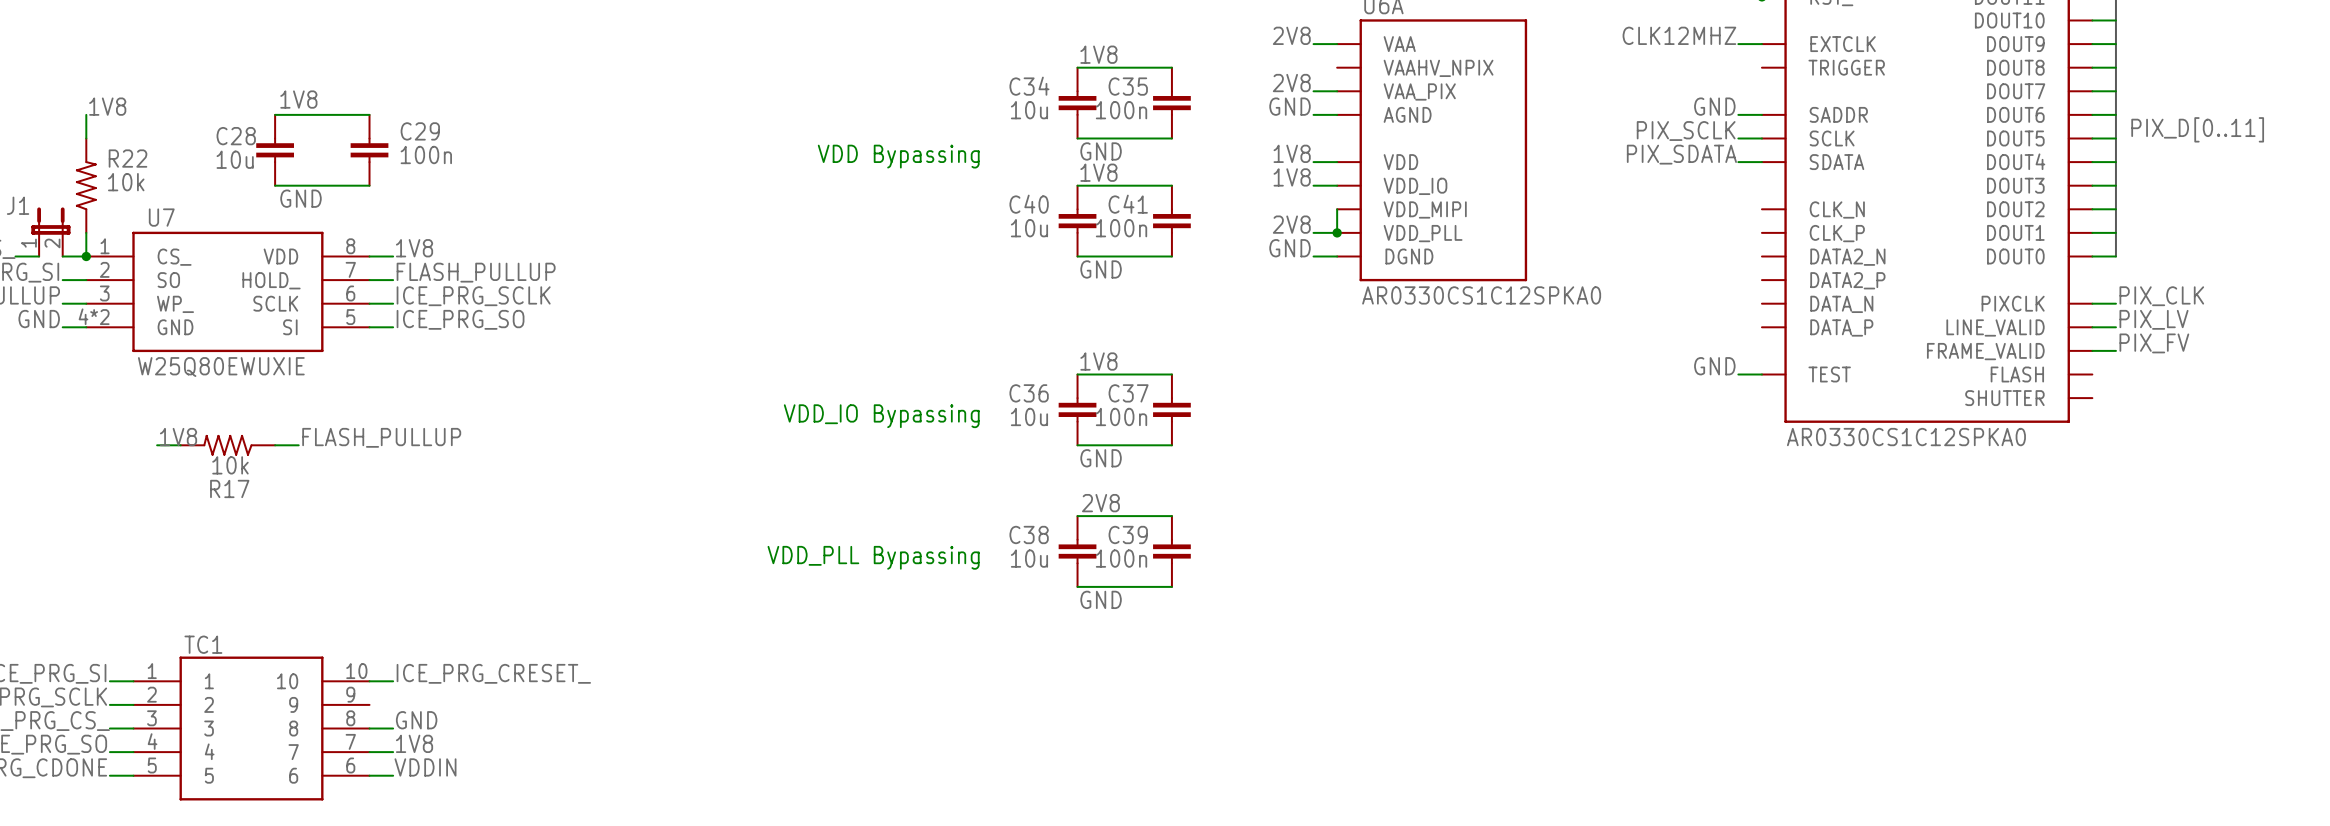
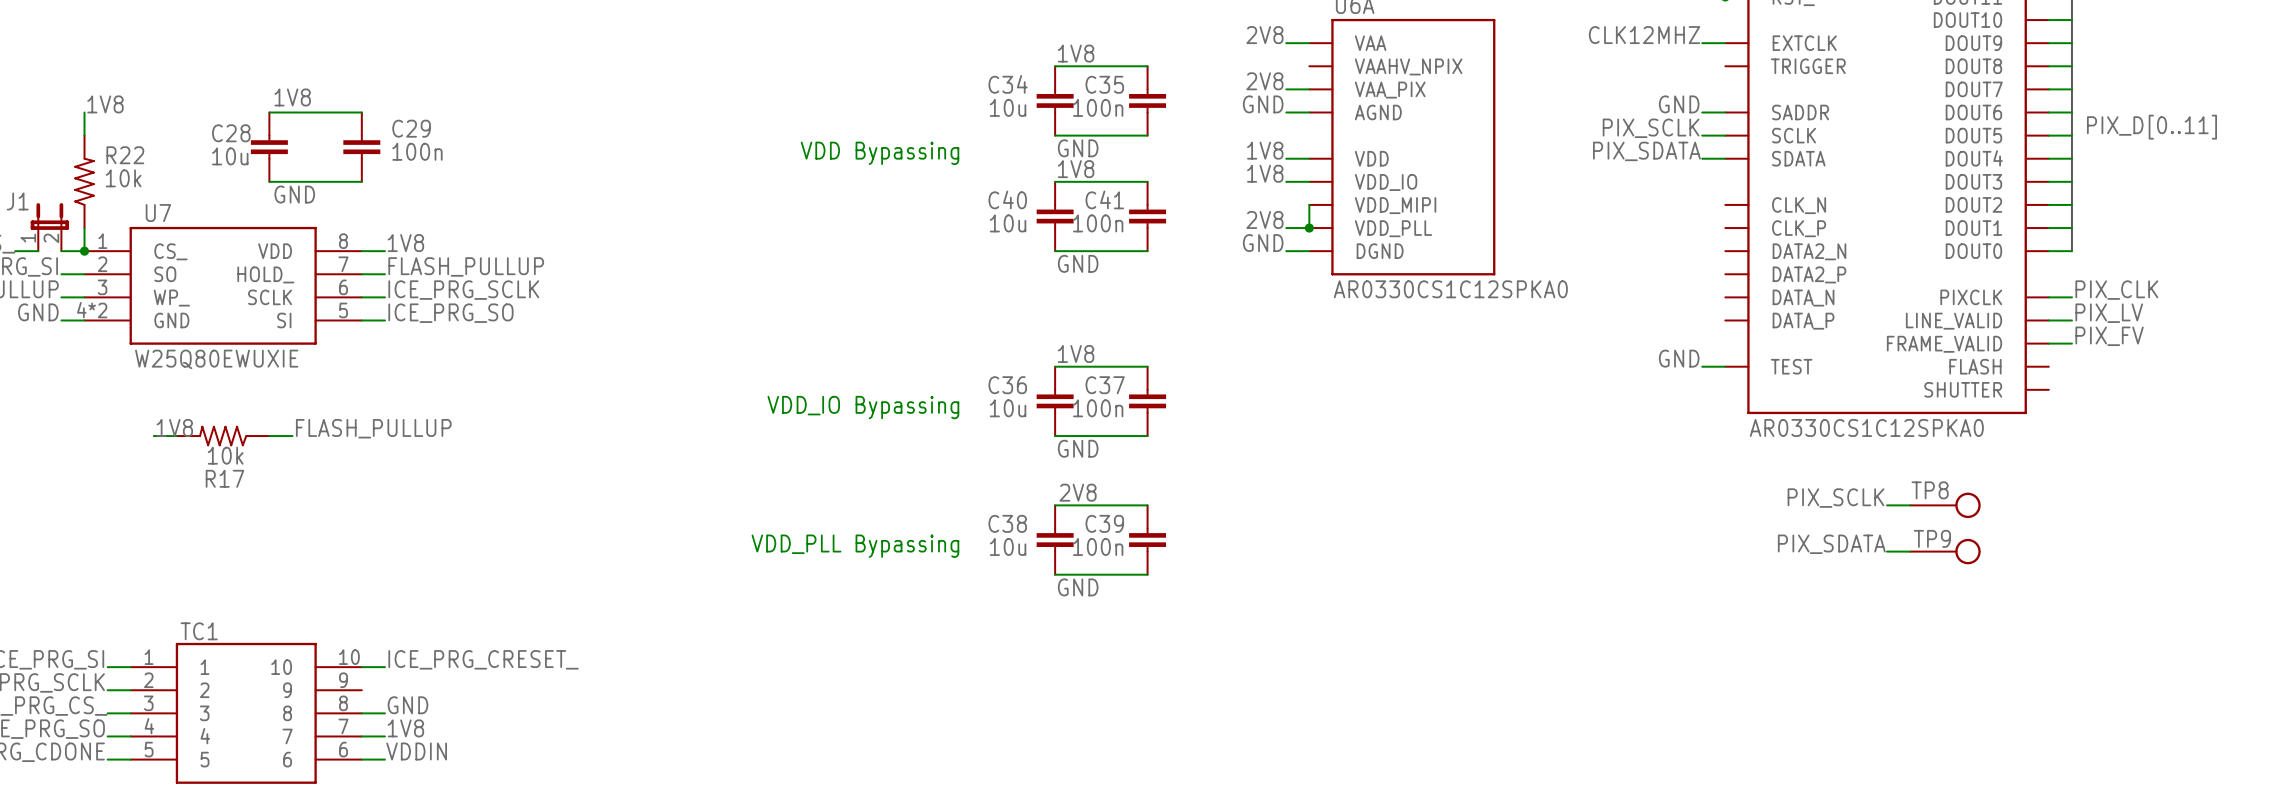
label: none -> PIX_SCLK (1835, 498)
wire: none -> (1887, 505) (1910, 505)
TP8: none -> (1945, 505)
label: none -> PIX_SDATA (1831, 544)
wire: none -> (1887, 551) (1910, 551)
TP9: none -> (1945, 551)

